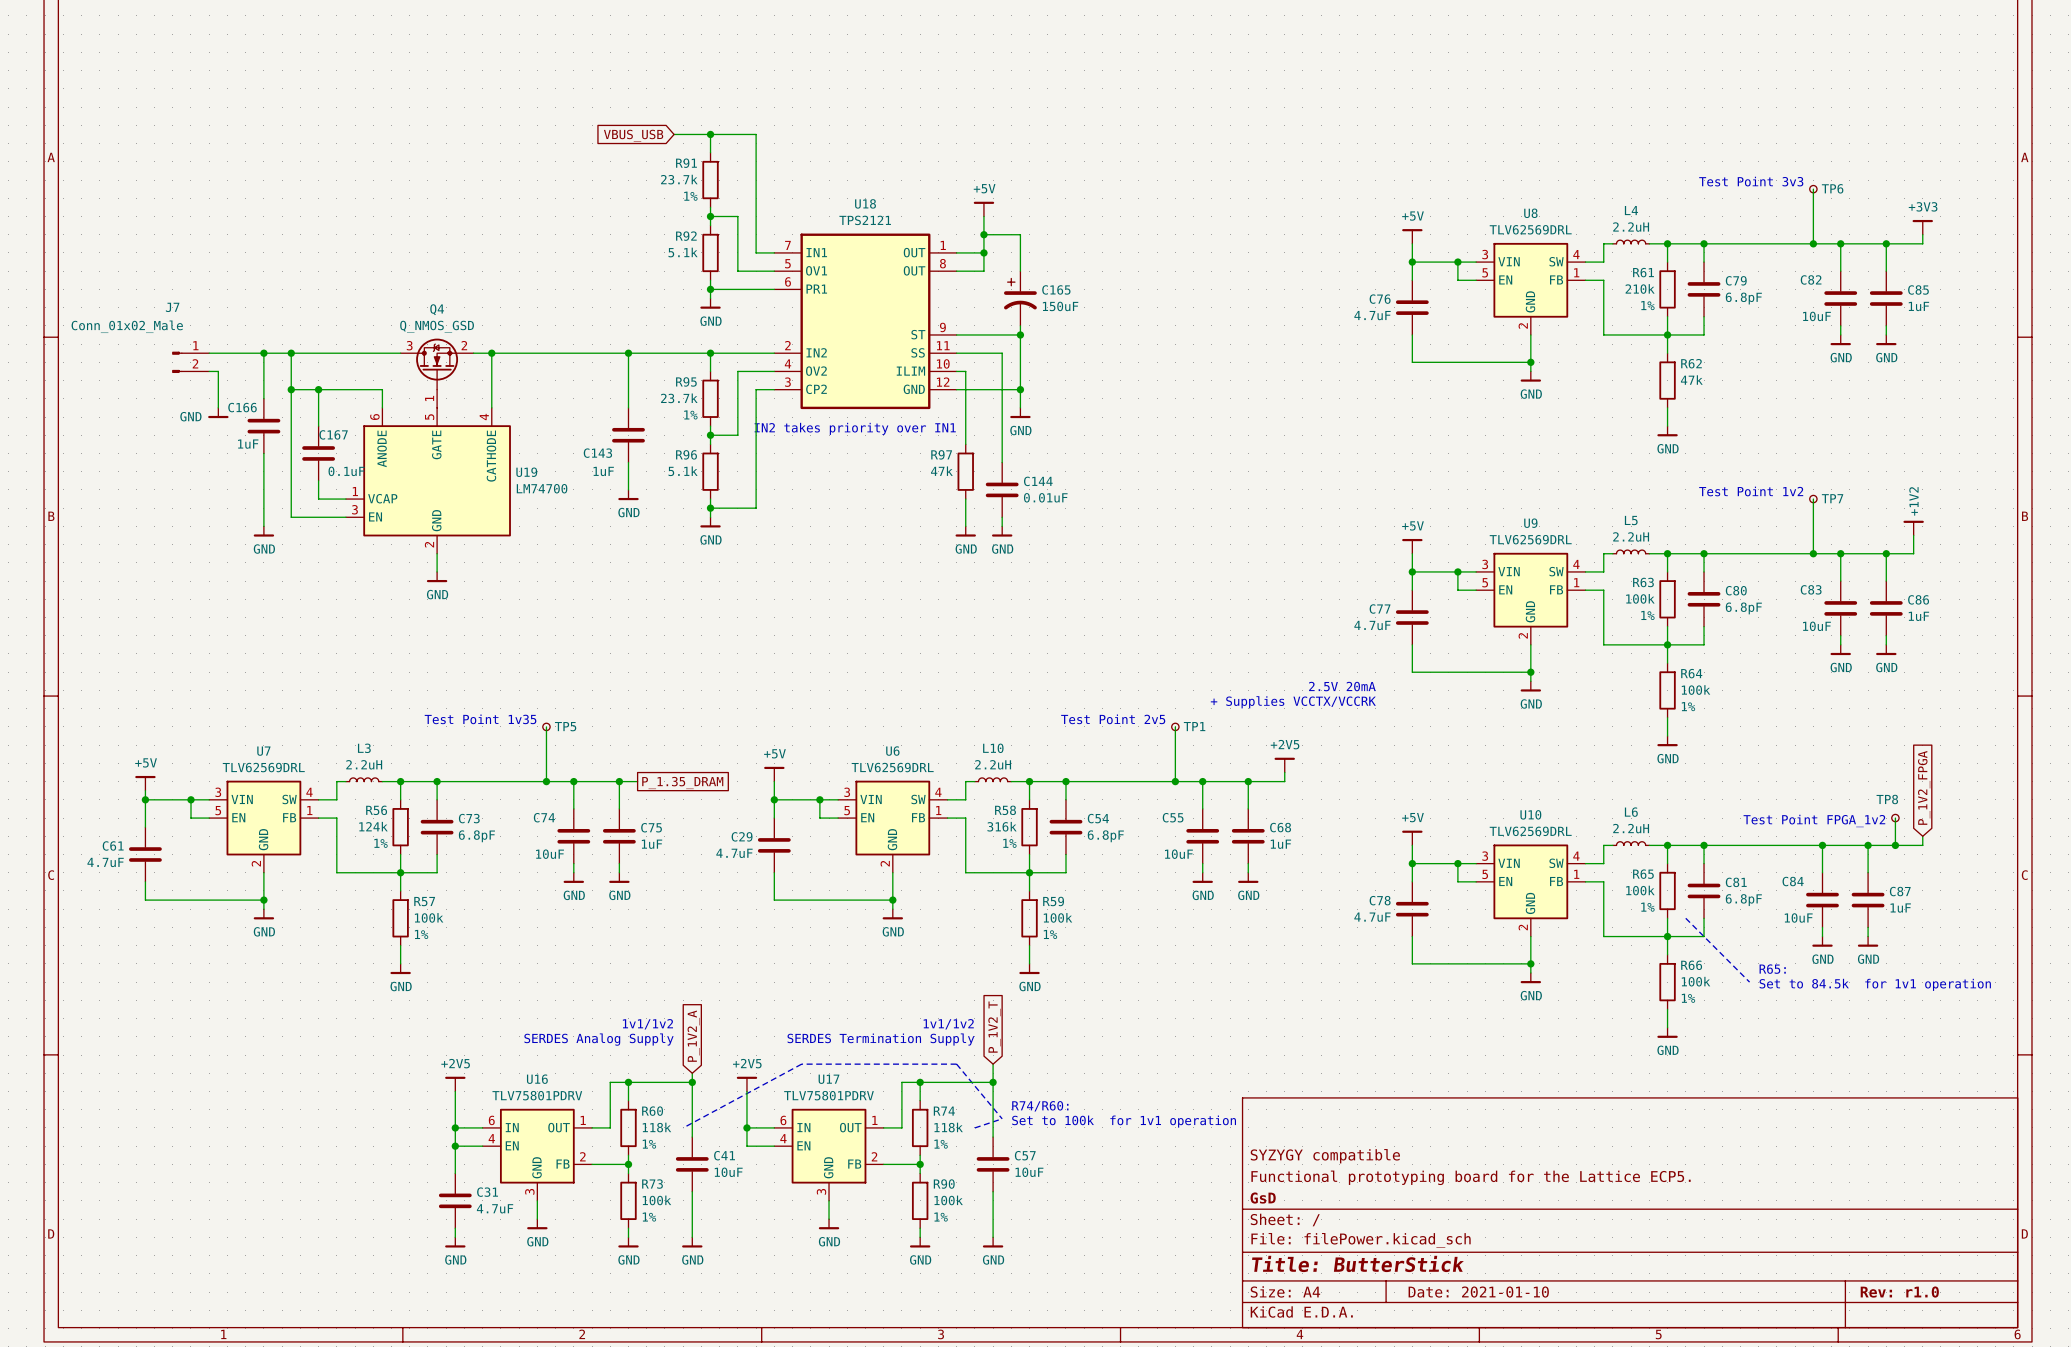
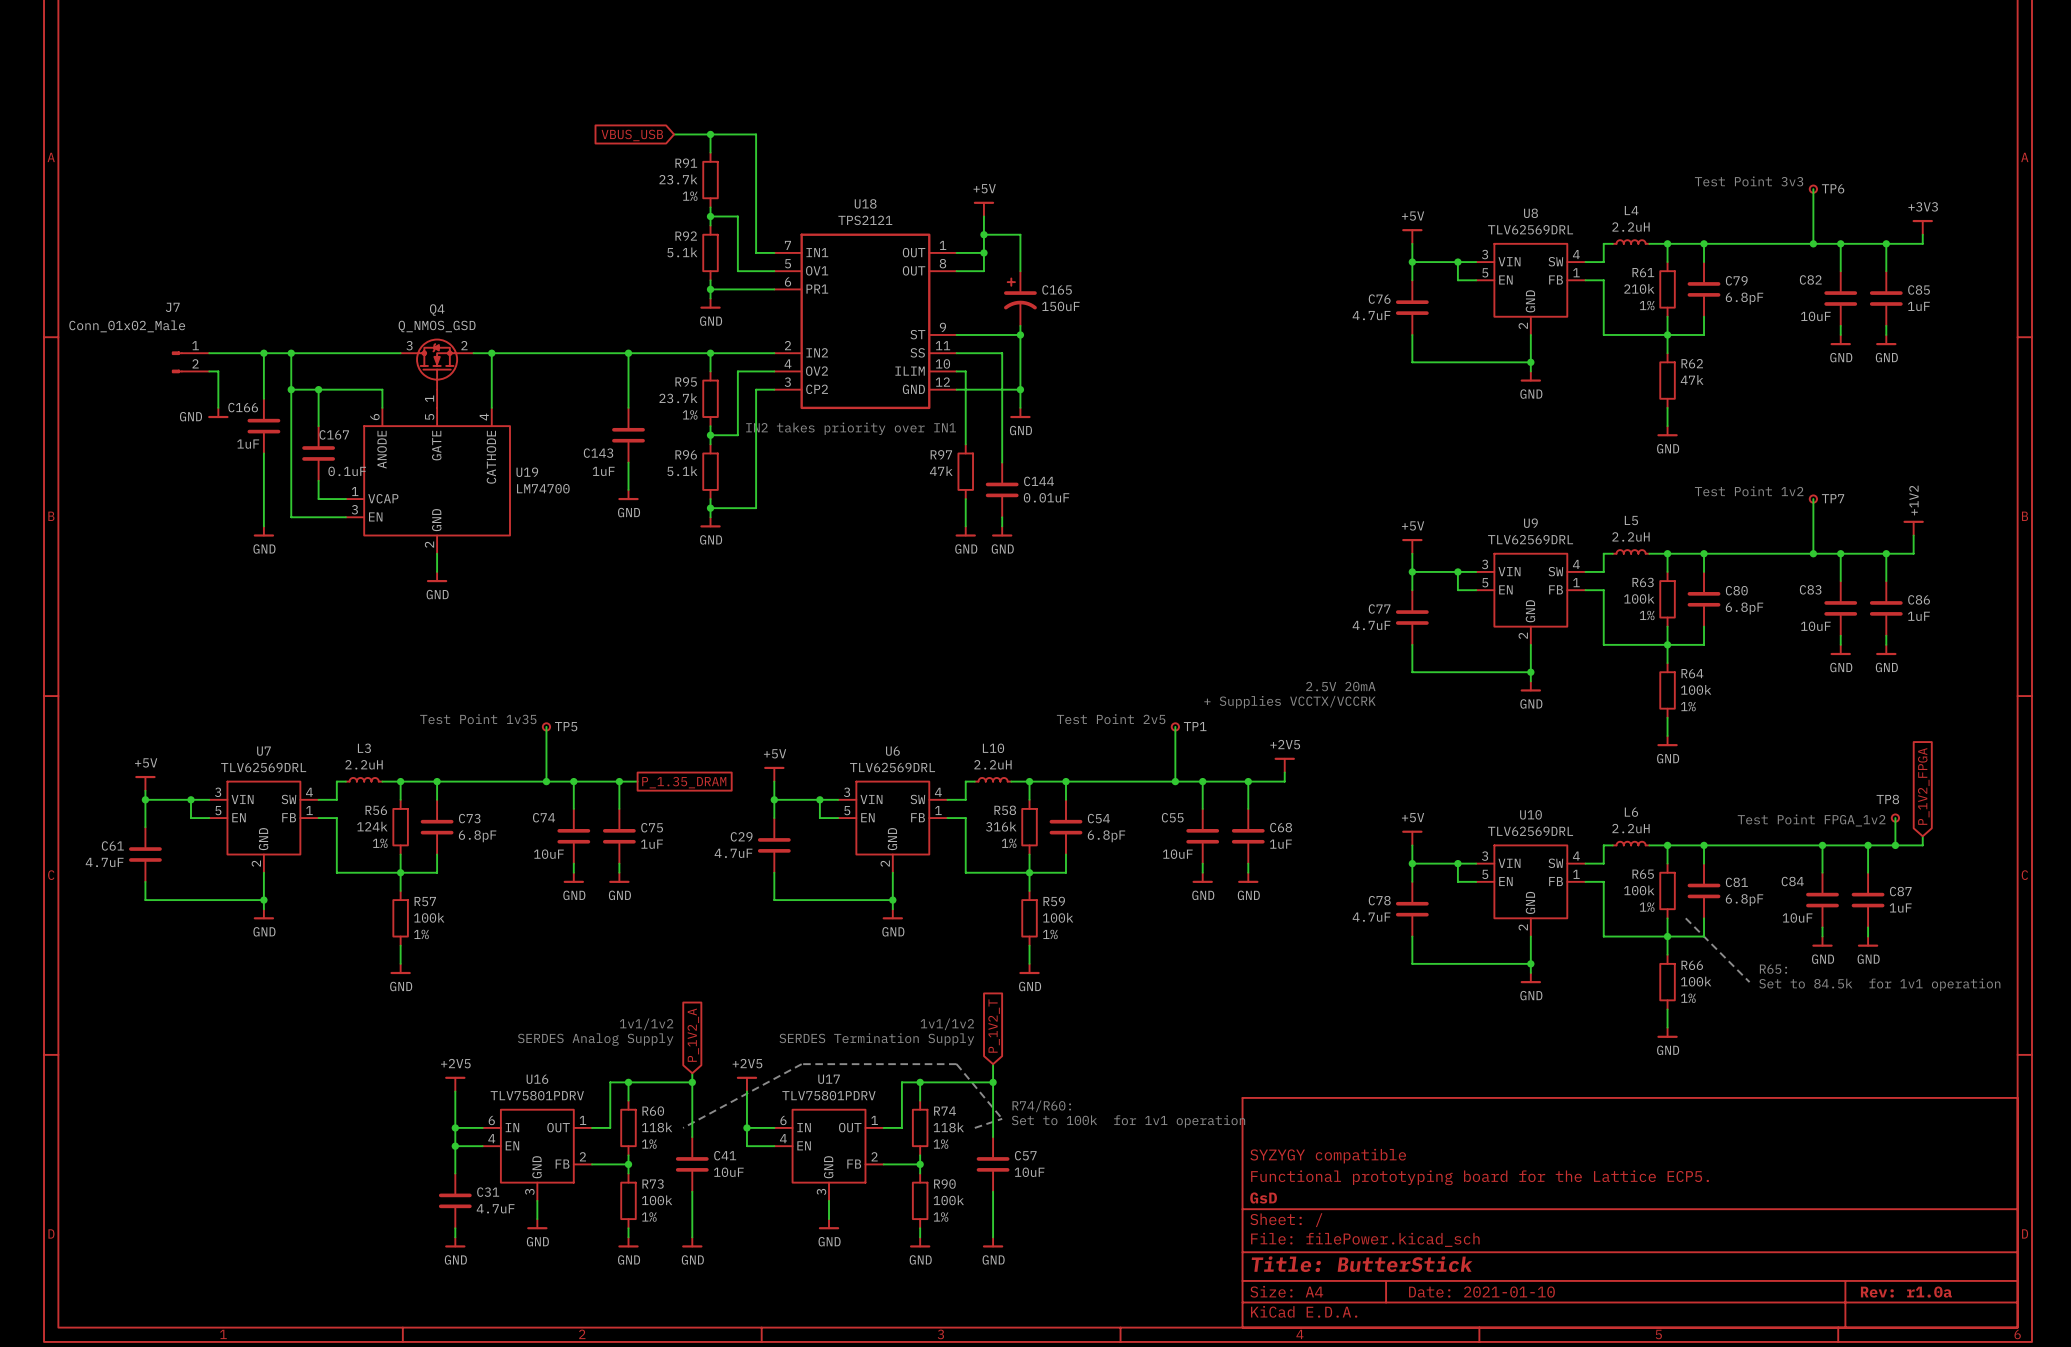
title block: Rev: r1.0 (1899, 1292) -> Rev: r1.0a (1906, 1292)

